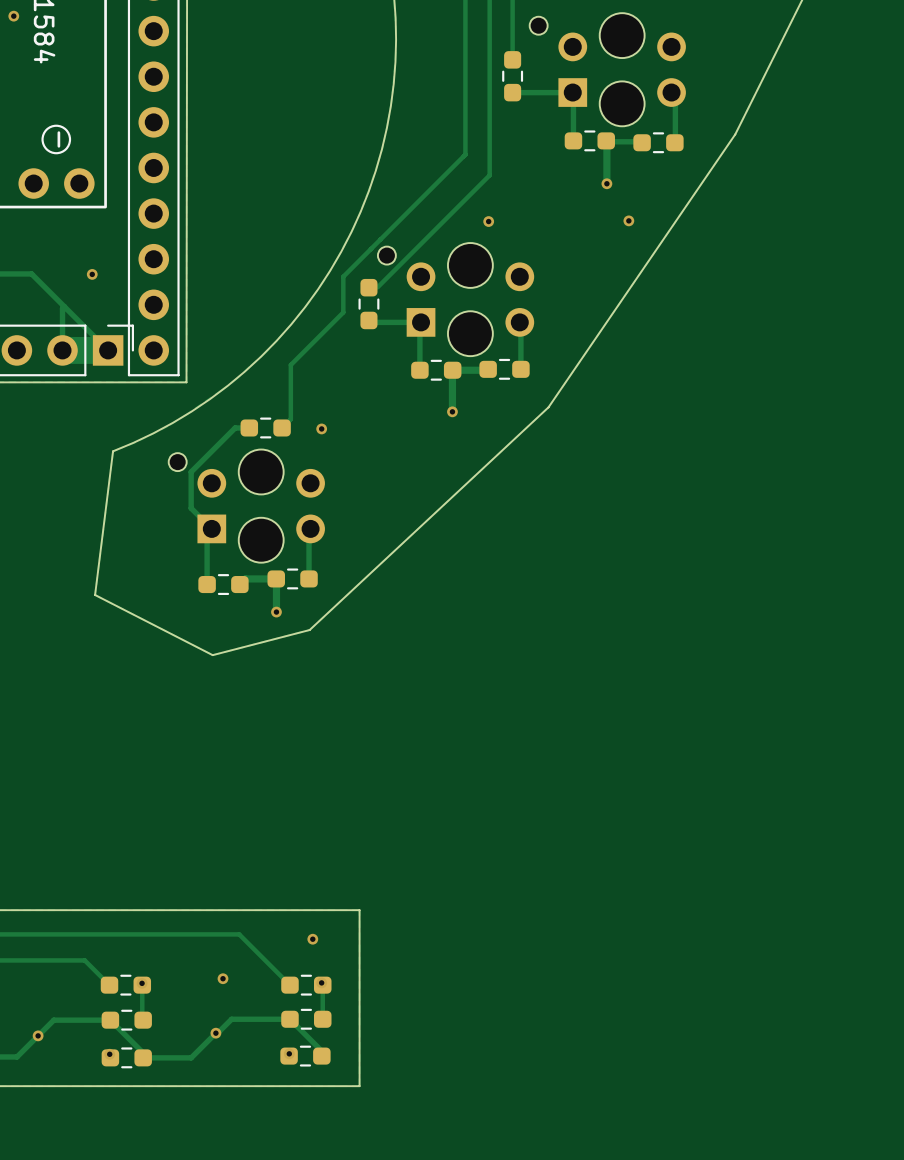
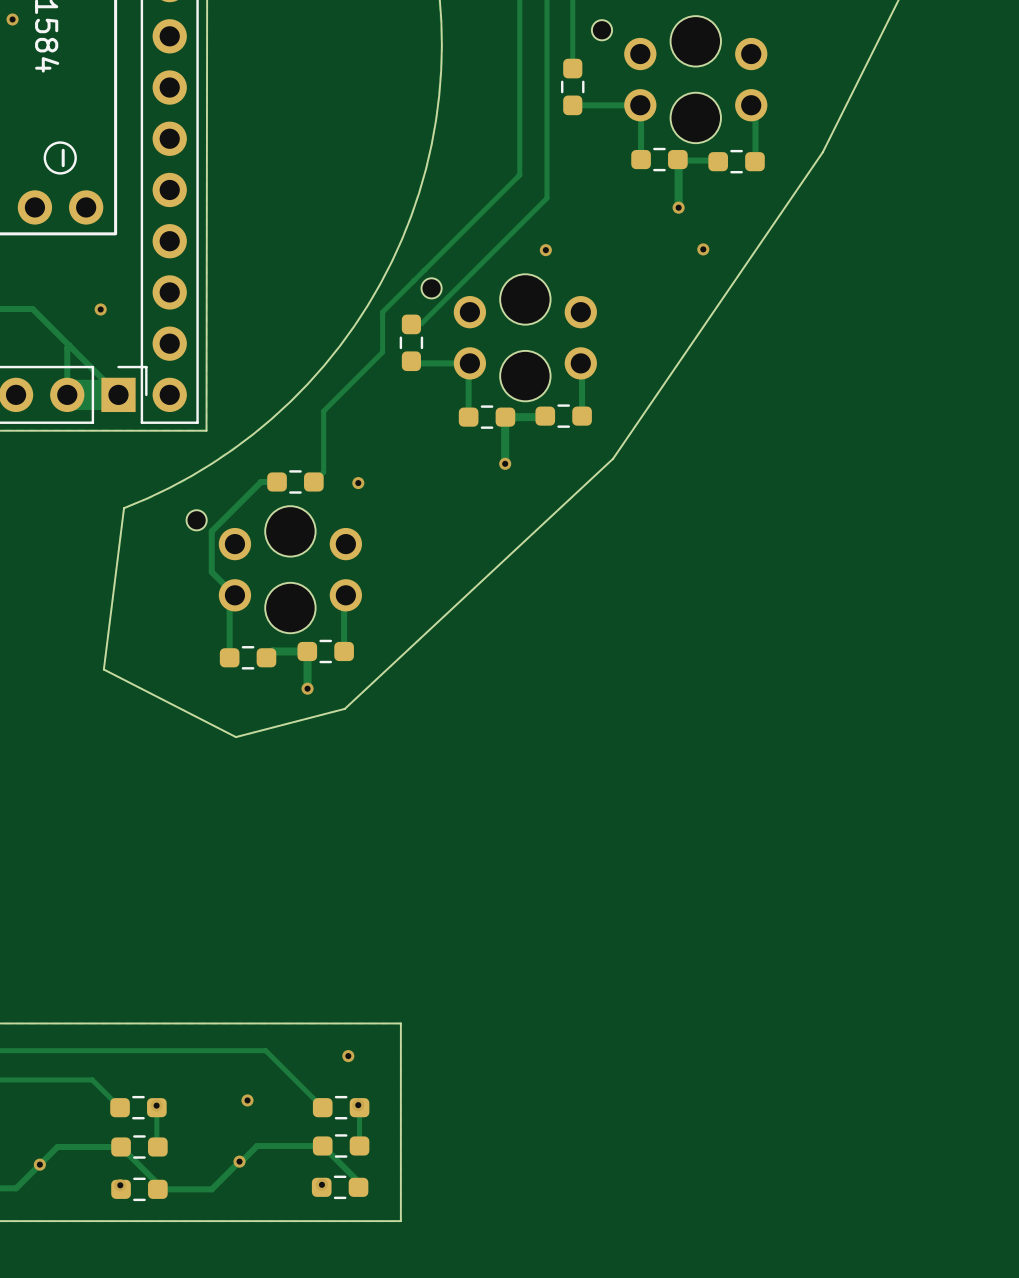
part footprint: [529, 13, 686, 127] -> [591, 16, 768, 144]
part footprint: [377, 243, 535, 357] -> [421, 274, 597, 402]
part footprint: [168, 449, 325, 563] -> [186, 506, 363, 634]

